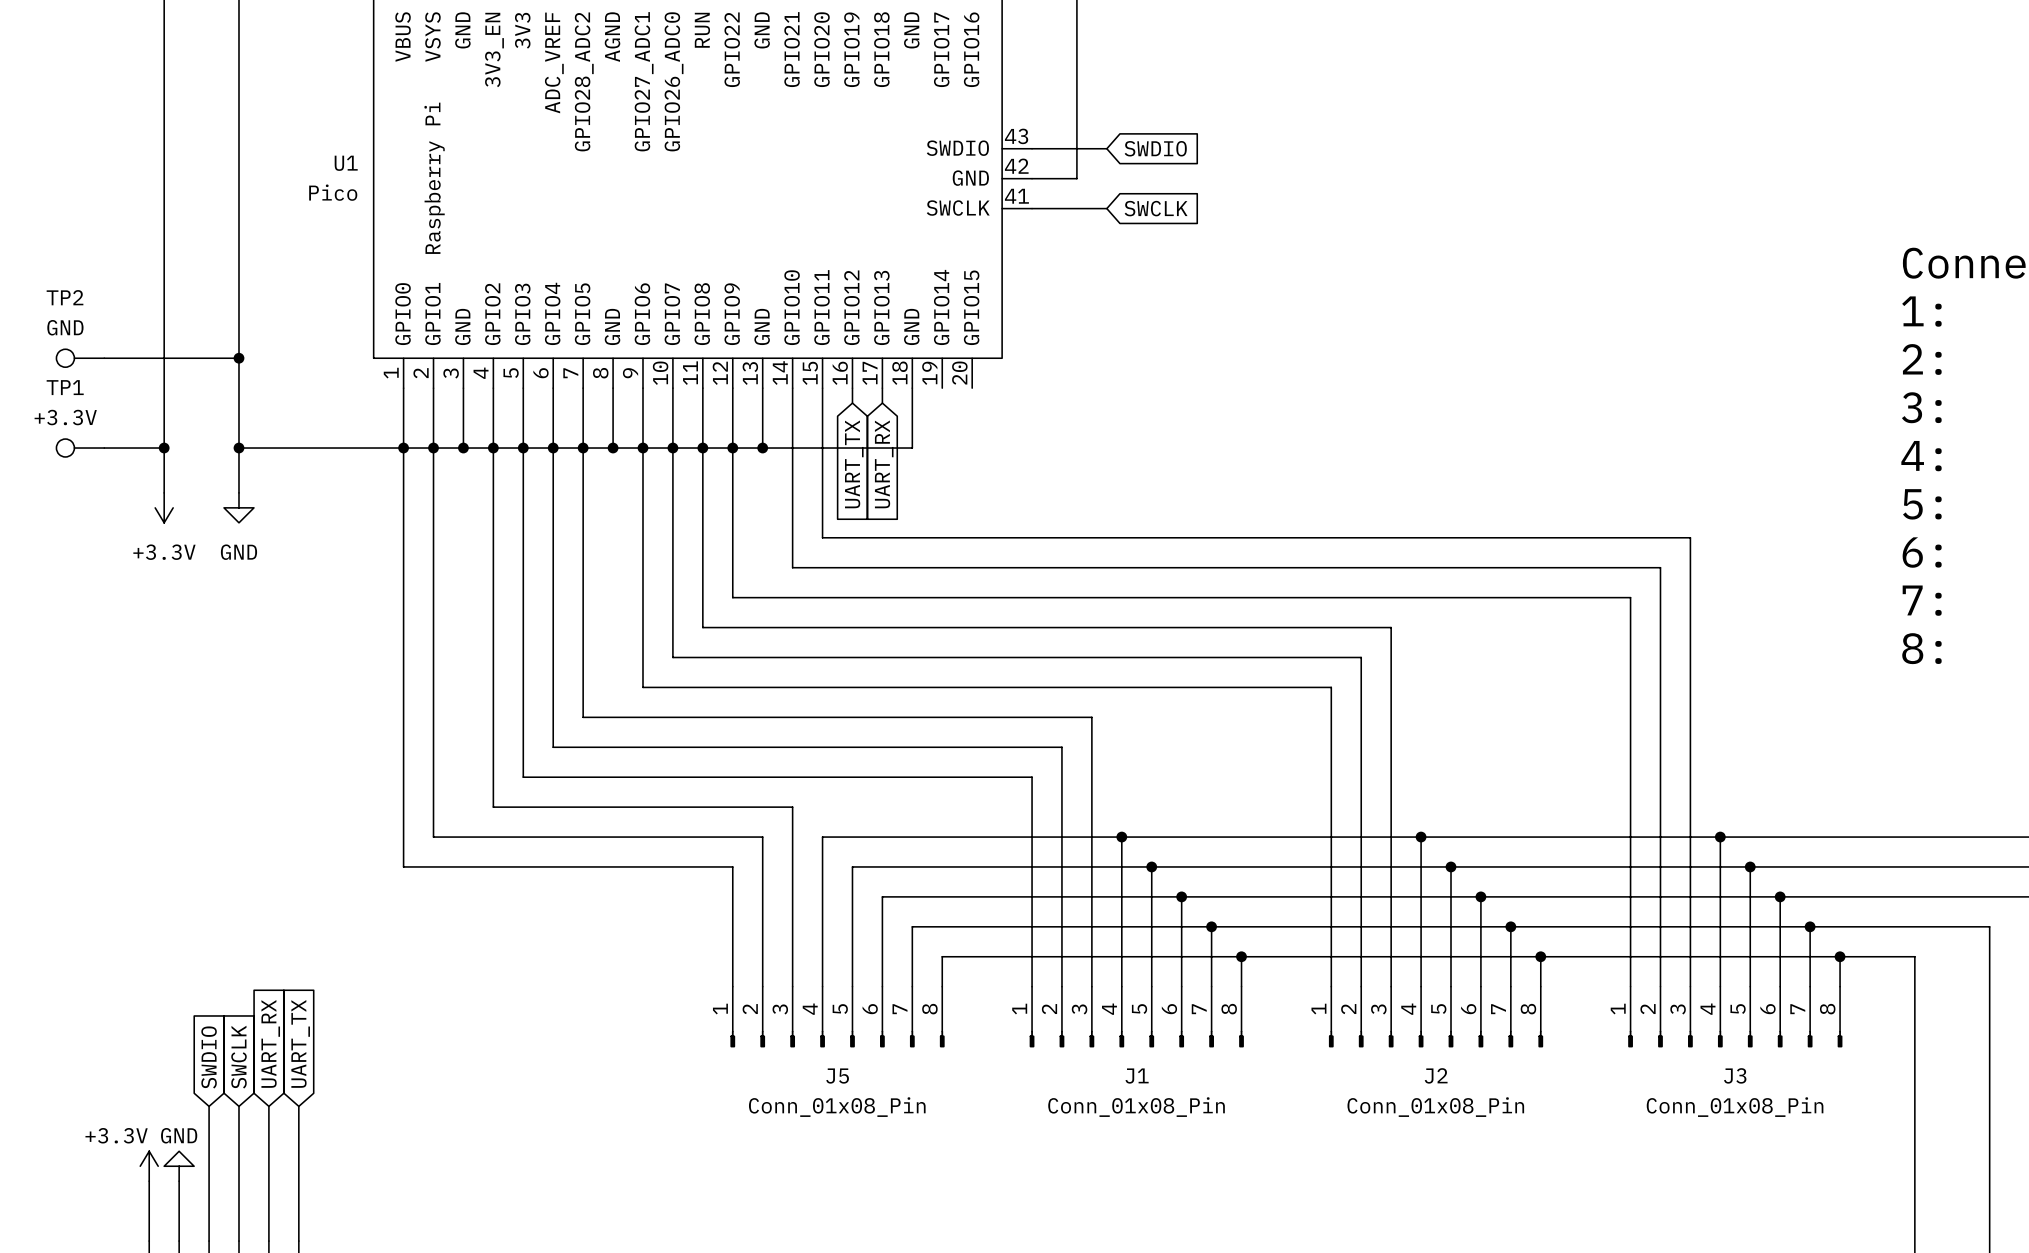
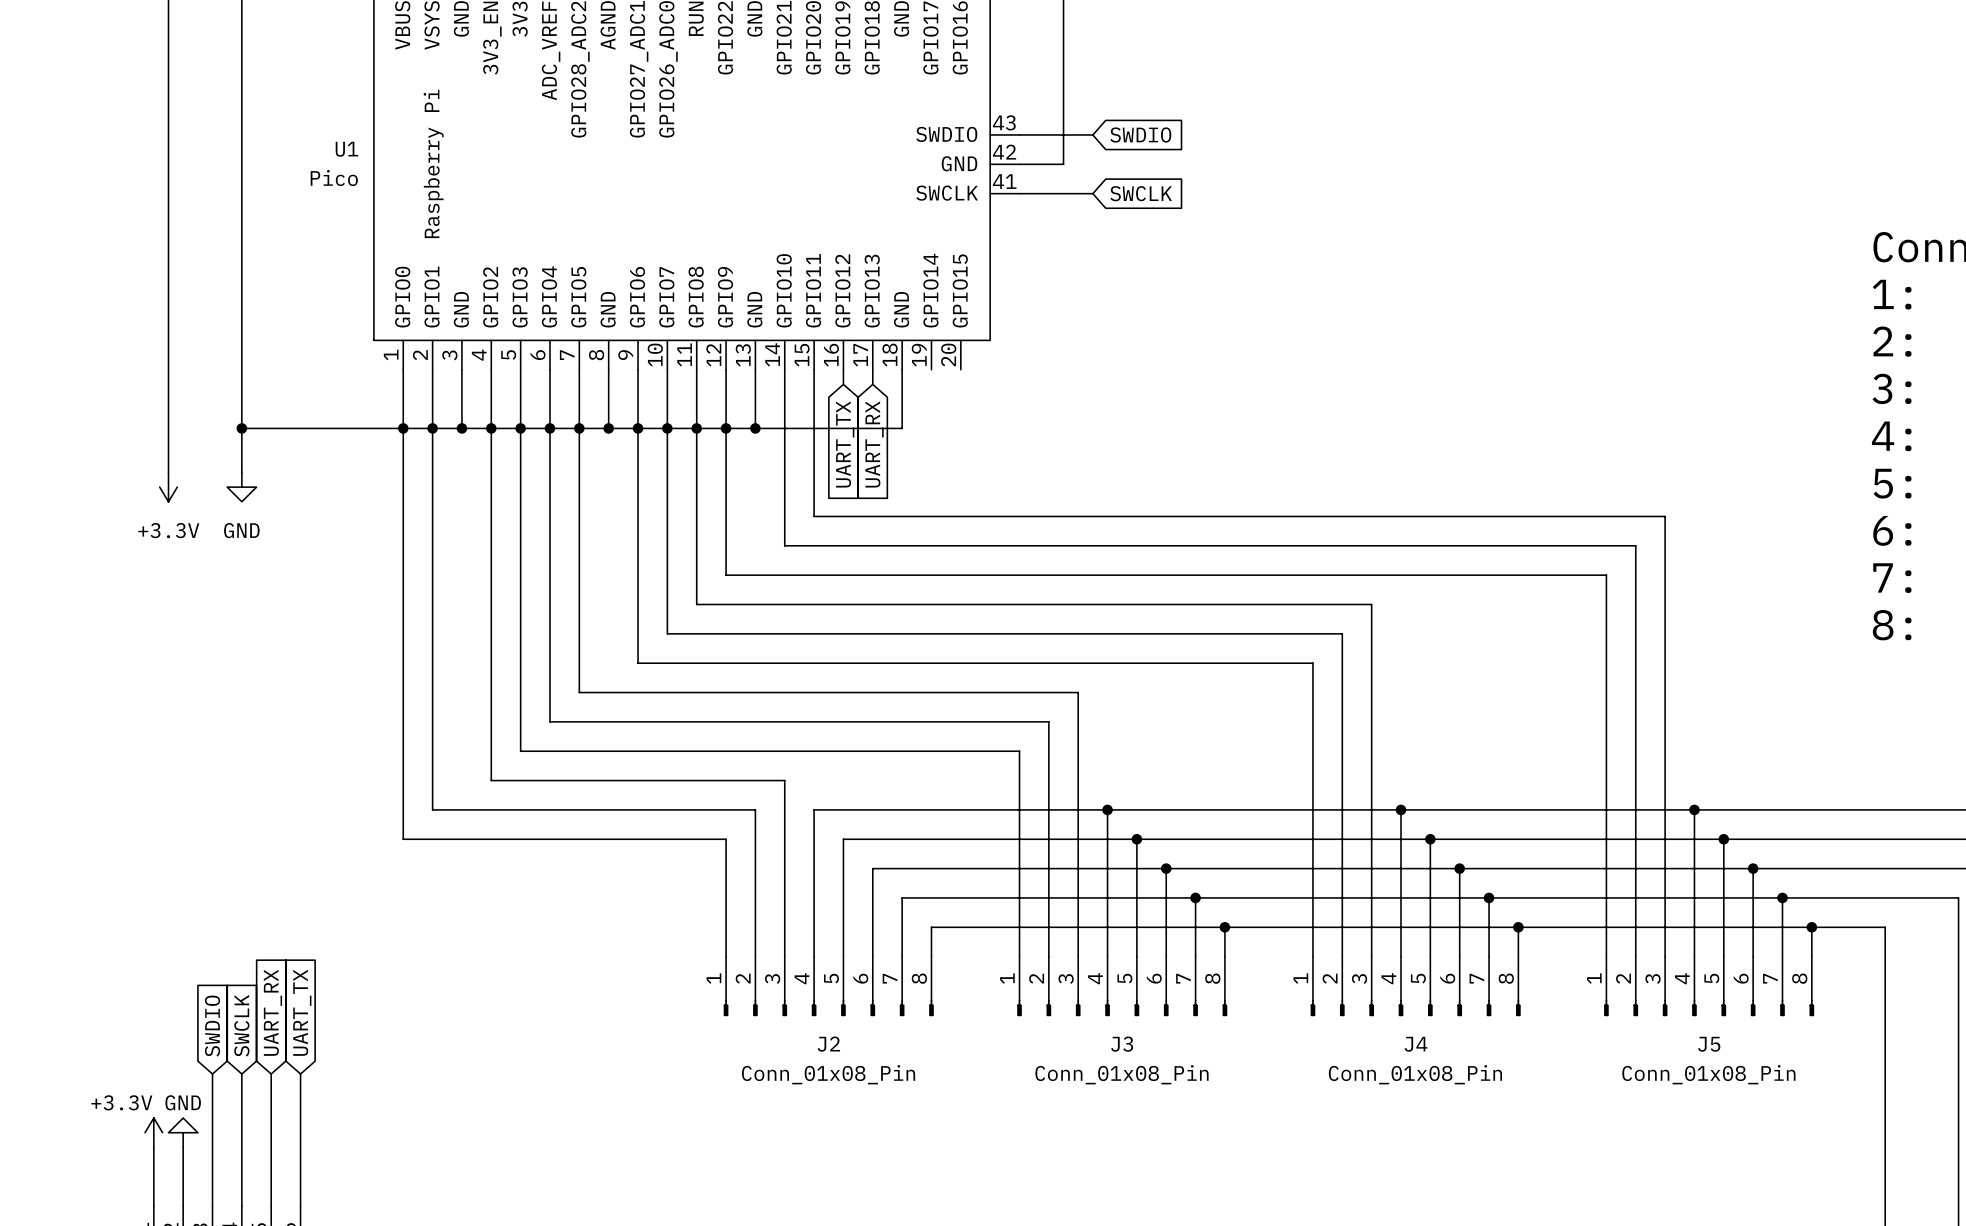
TP2: GND (80, 358) -> none
wire: (104, 358) (238, 358) -> none
junction: (238, 358) -> none
TP1: +3.3V (80, 448) -> none
wire: (104, 448) (164, 448) -> none
junction: (164, 448) -> none
J2 name: J2 (1436, 1075) -> J4 (1416, 1044)
J3 name: J3 (1735, 1075) -> J5 (1709, 1044)
J5 name: J5 (837, 1076) -> J2 (828, 1044)
J1 name: J1 (1137, 1076) -> J3 (1122, 1044)

